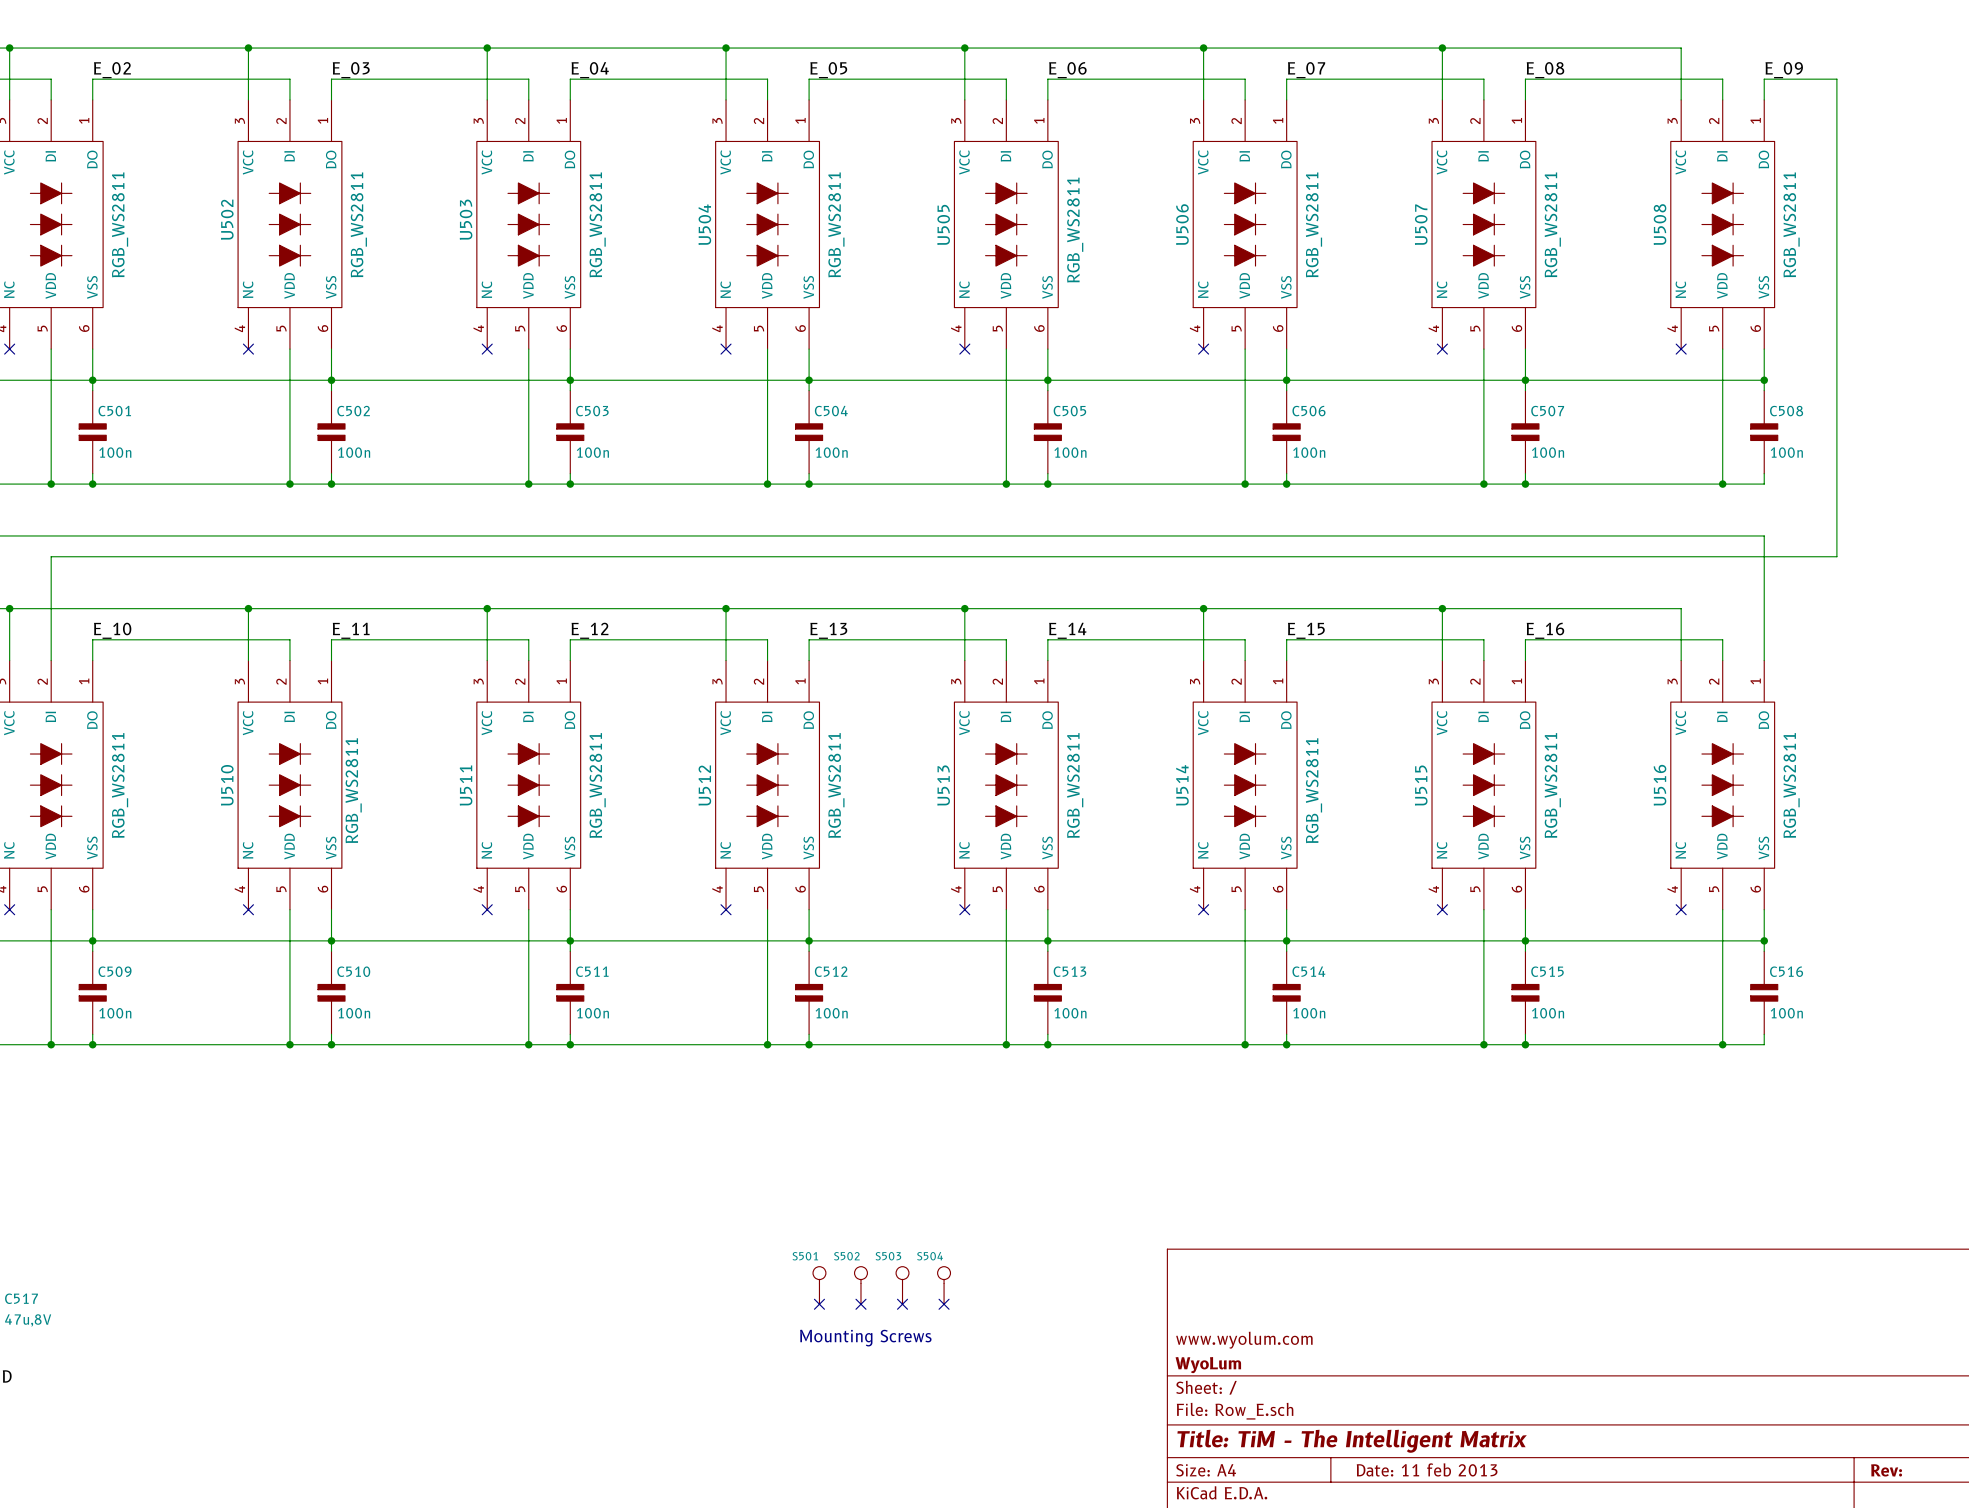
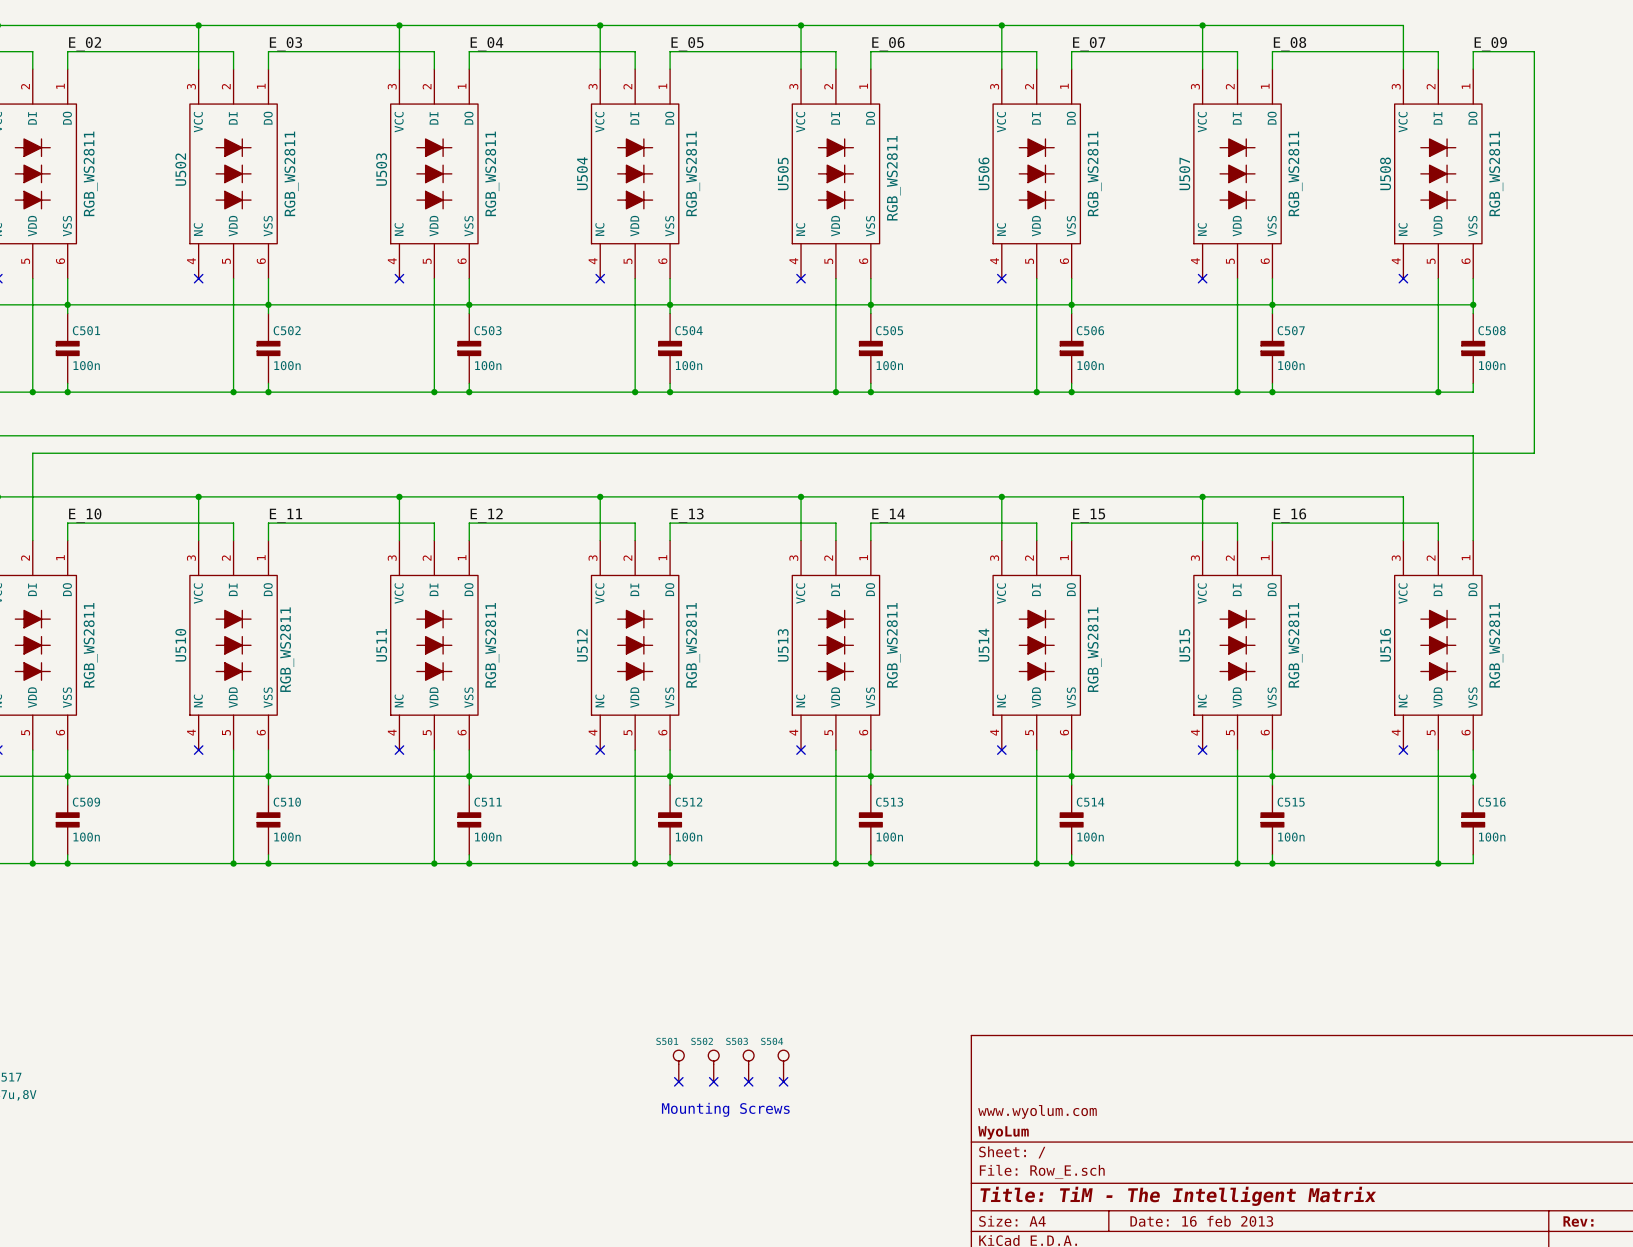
title block: Date: 11 feb 2013 (1427, 1469) -> Date: 16 feb 2013 (1201, 1221)

